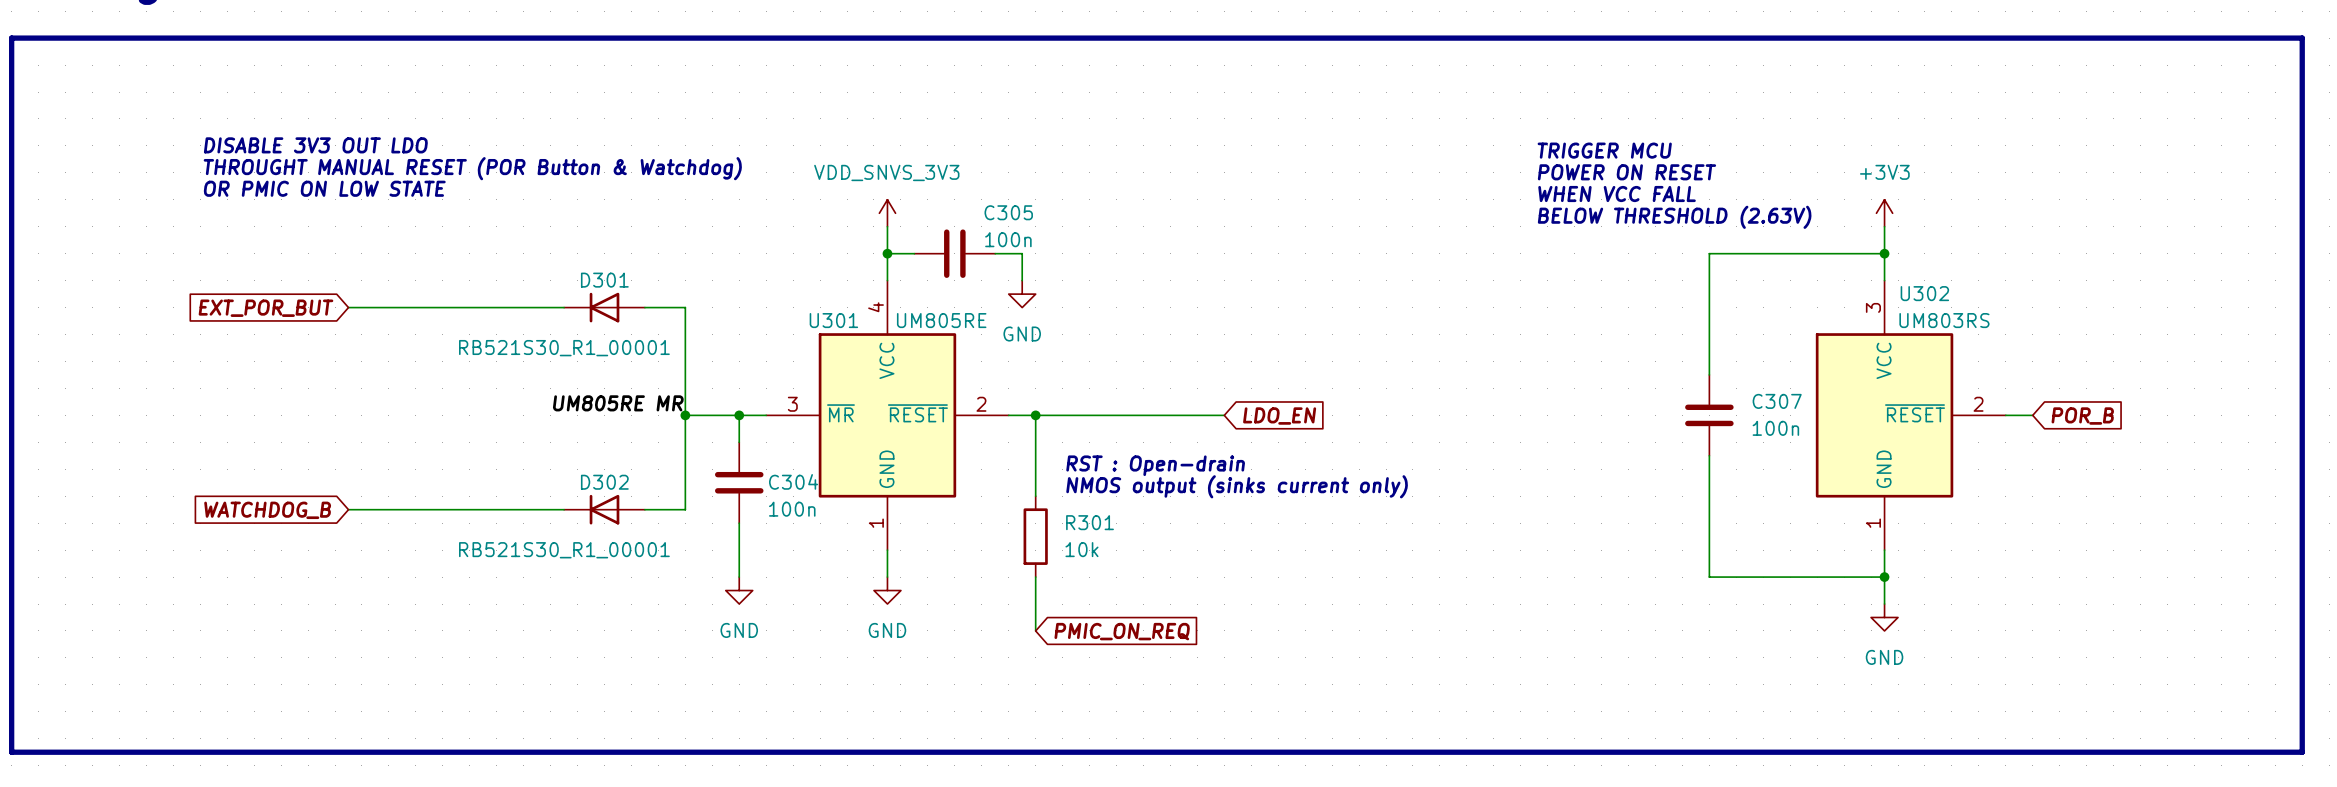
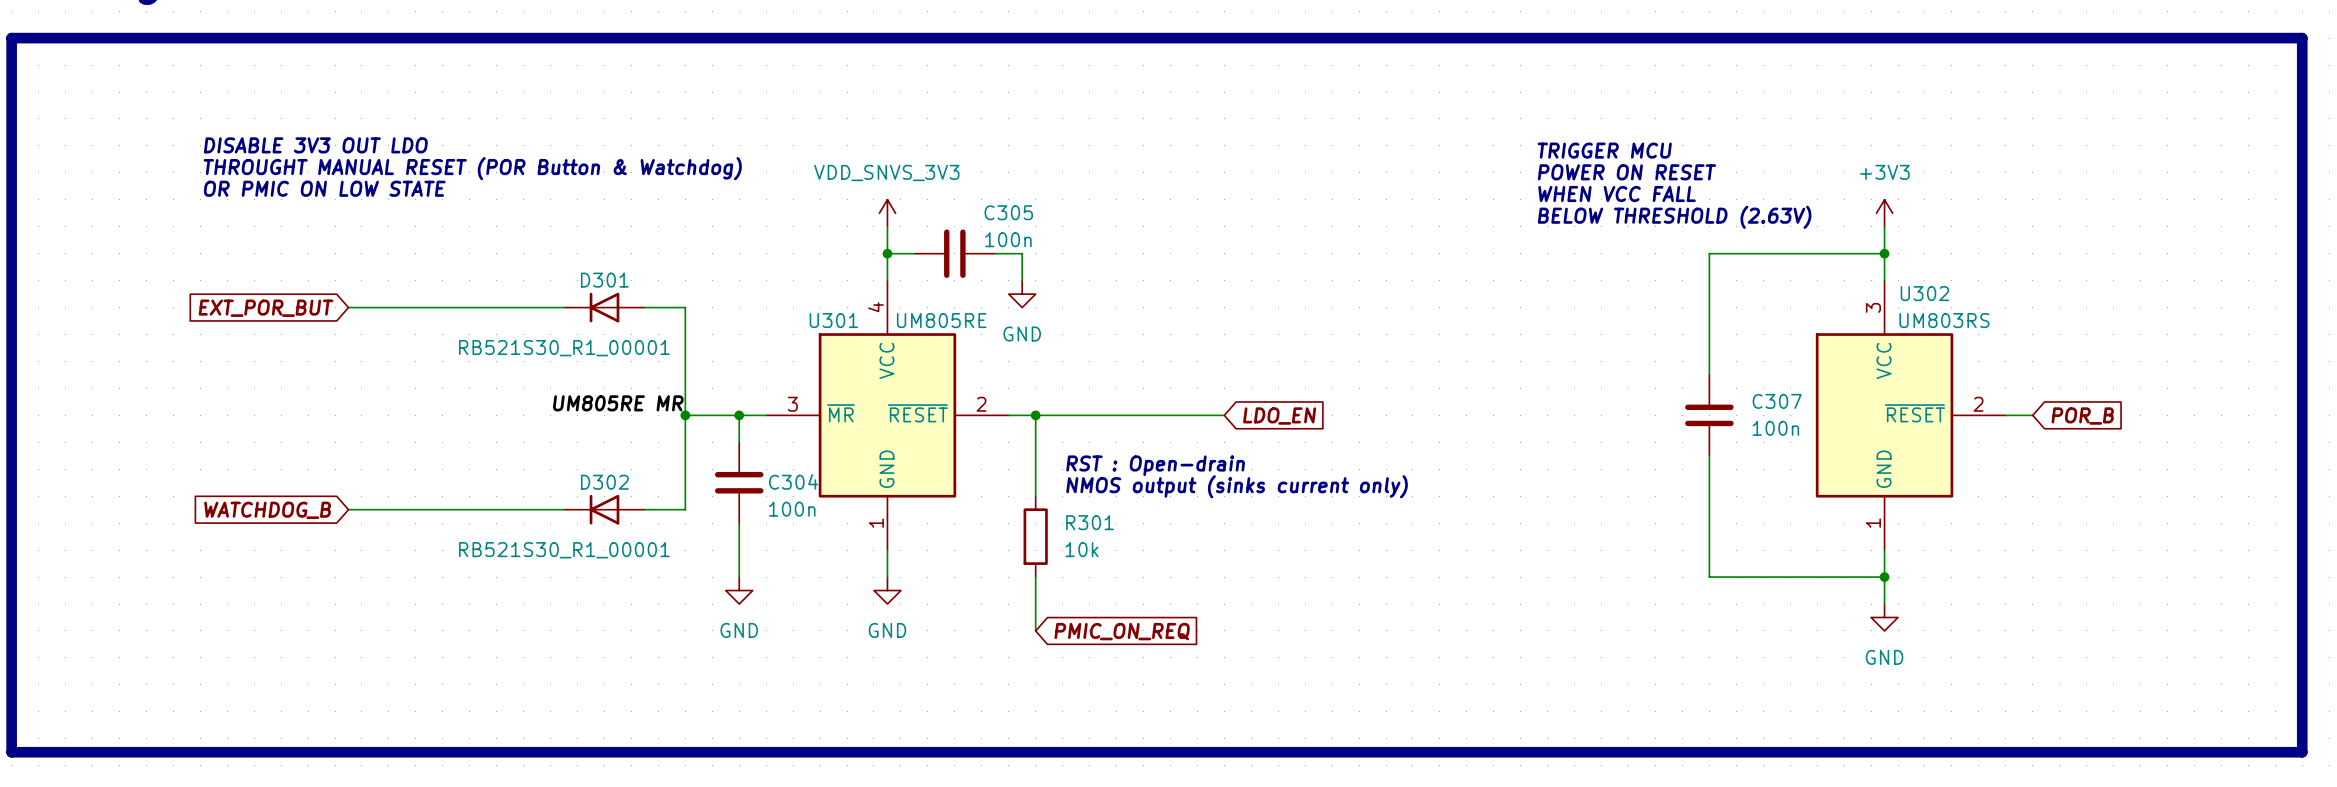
line width: thin (11, 38) (11, 752) (2302, 752) (2302, 38) (11, 38) -> thick (11, 38) (11, 752) (2302, 752) (2302, 38) (11, 38)

